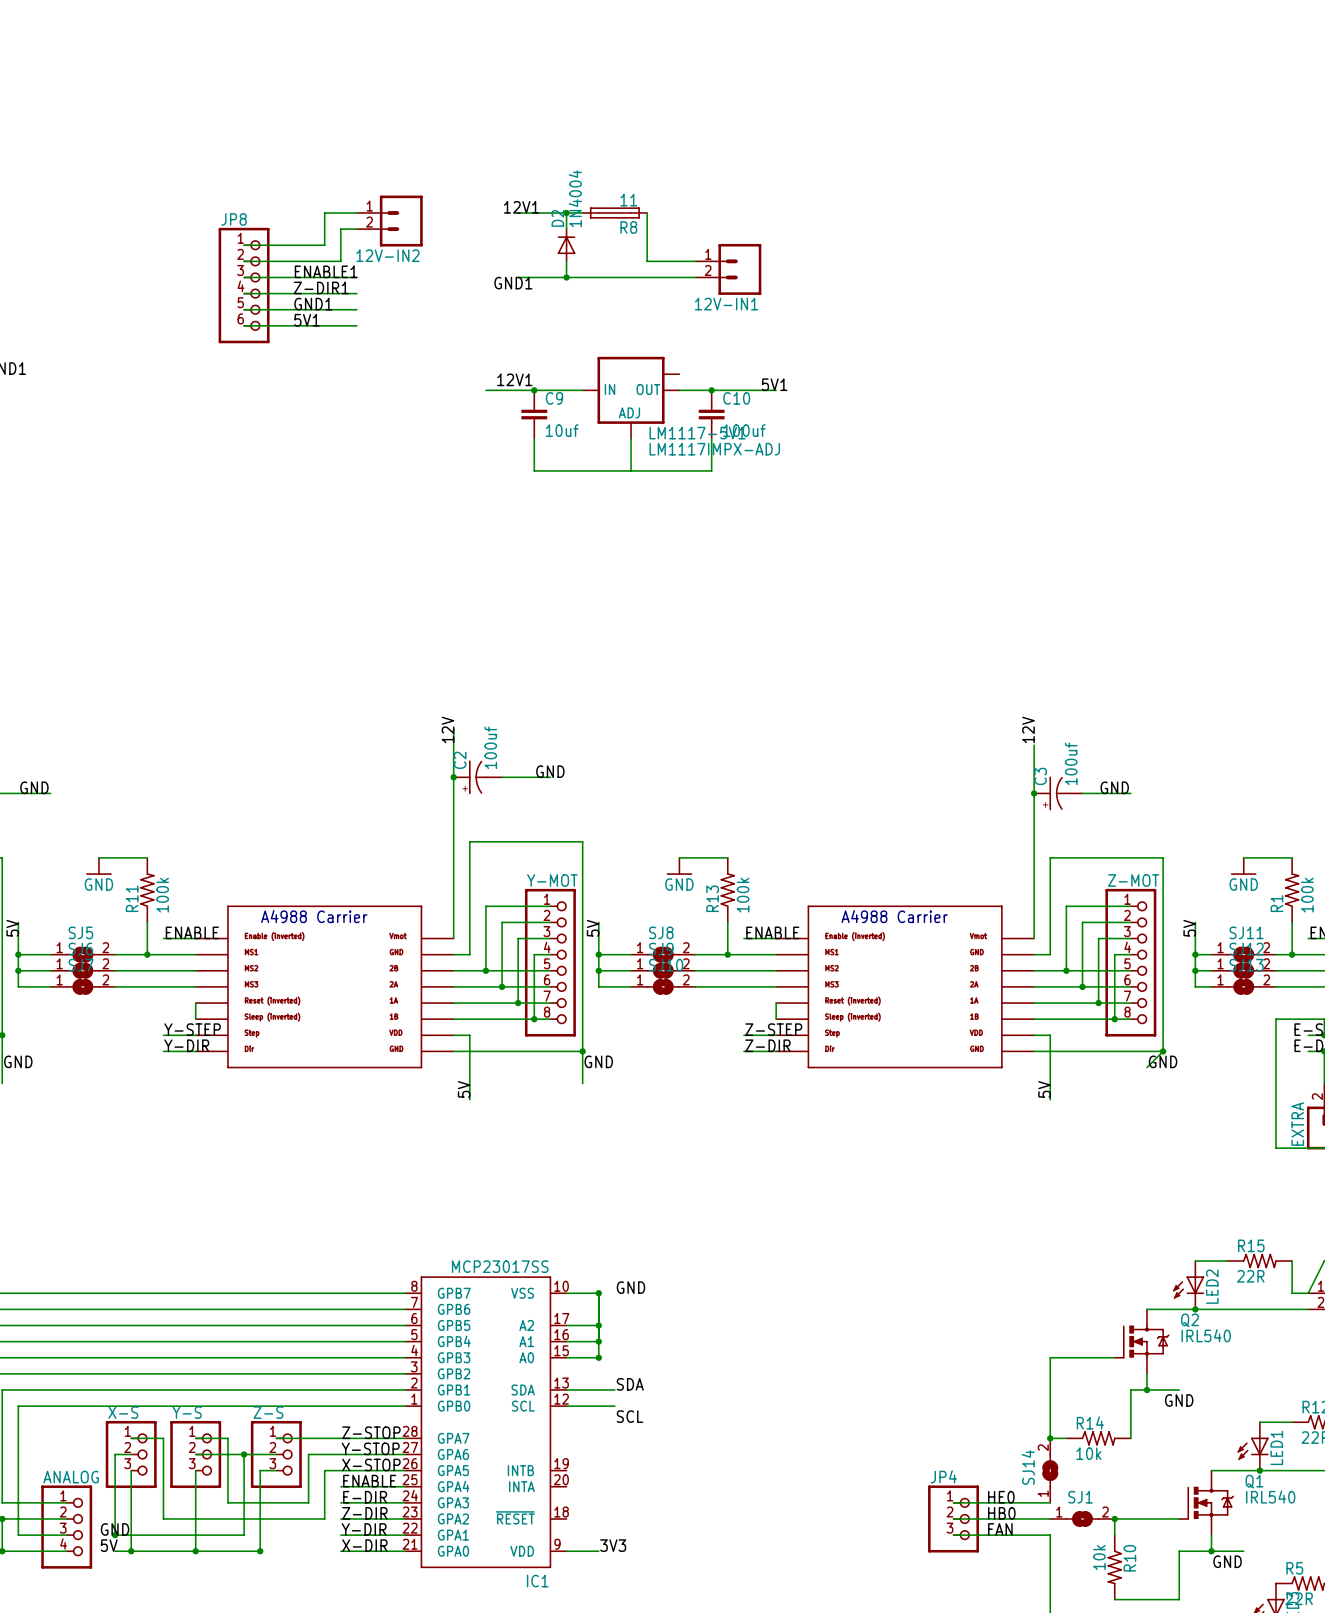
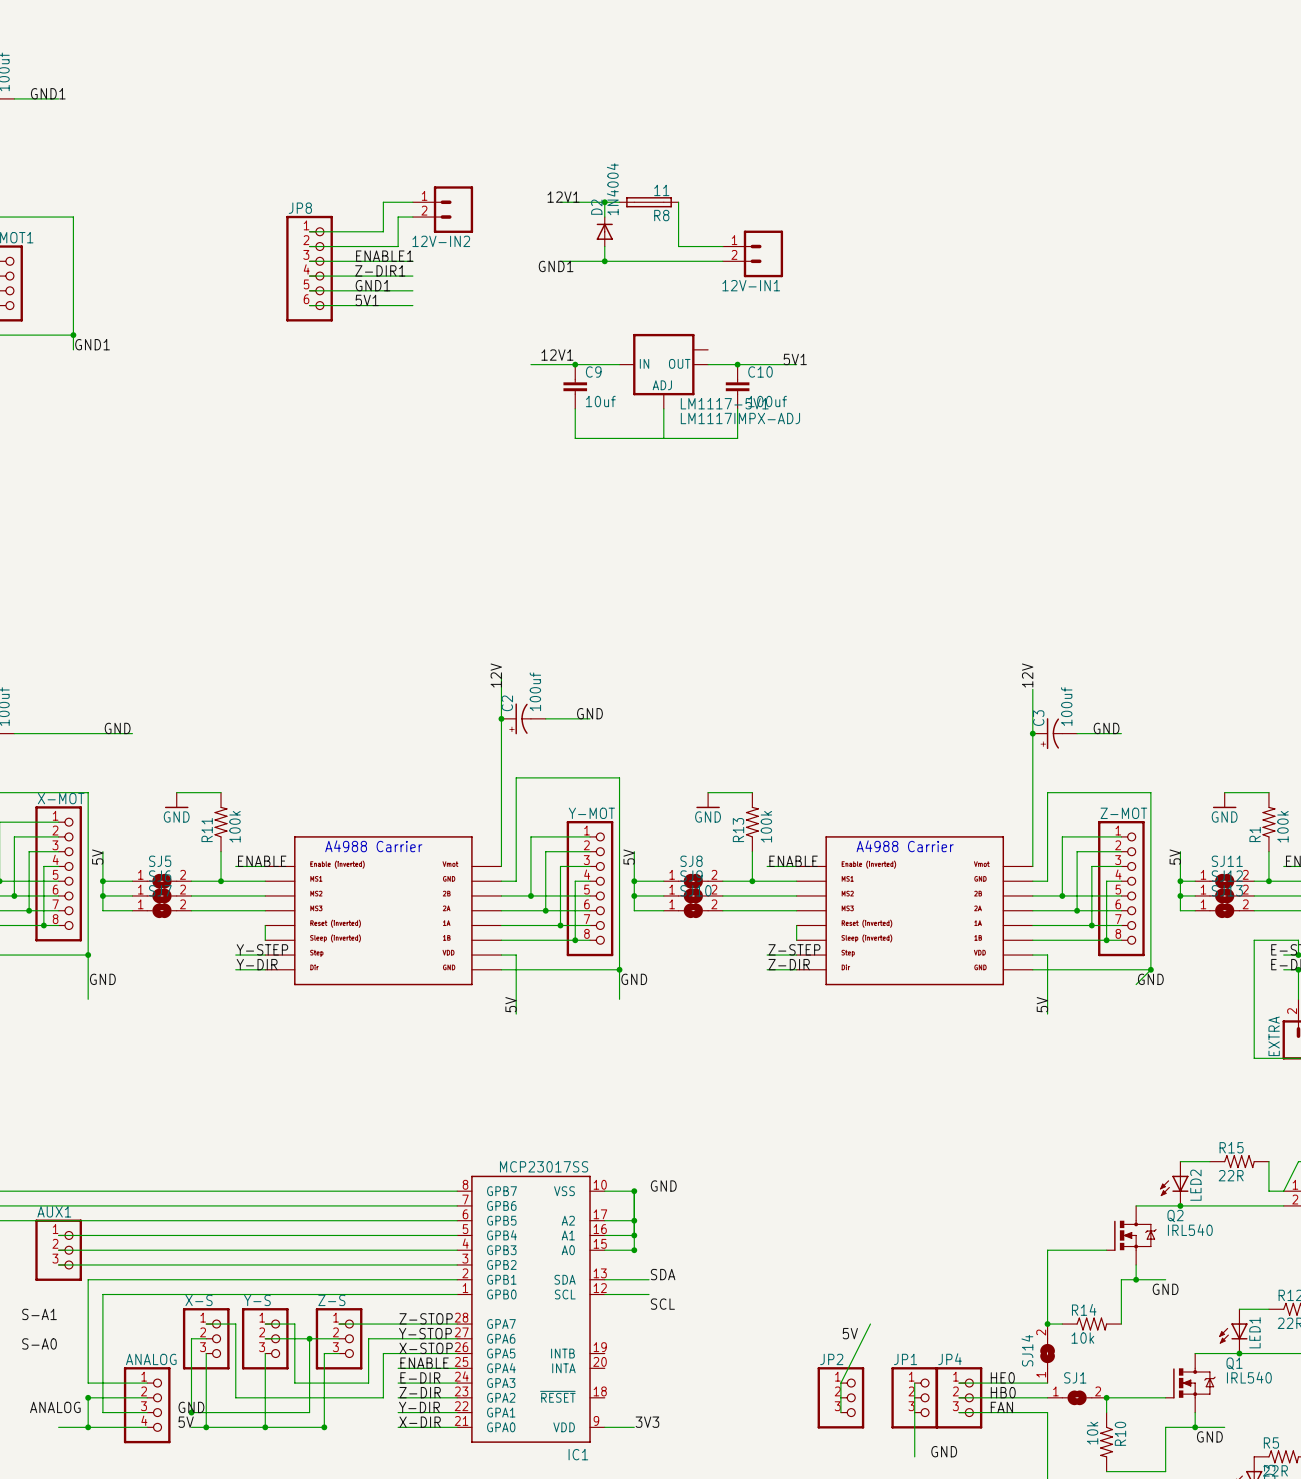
wire: none -> (870, 1324) (840, 1383) (840, 1412)
label: none -> 5V (850, 1333)
wire: none -> (914, 1383) (914, 1456)
JP2: none -> (840, 1397)
JP1: none -> (914, 1397)
label: none -> GND (944, 1451)

